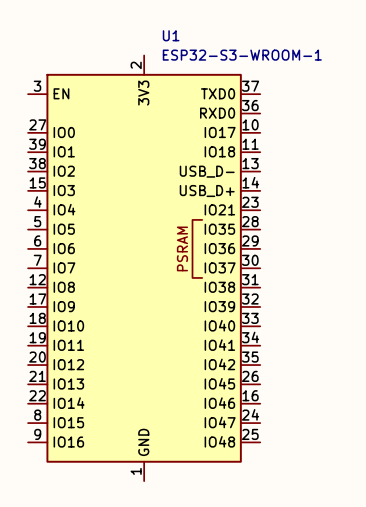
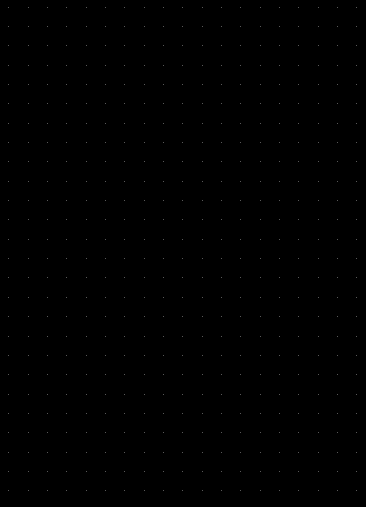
U1: ESP32-S3-WROOM-1 (144, 268) -> none

